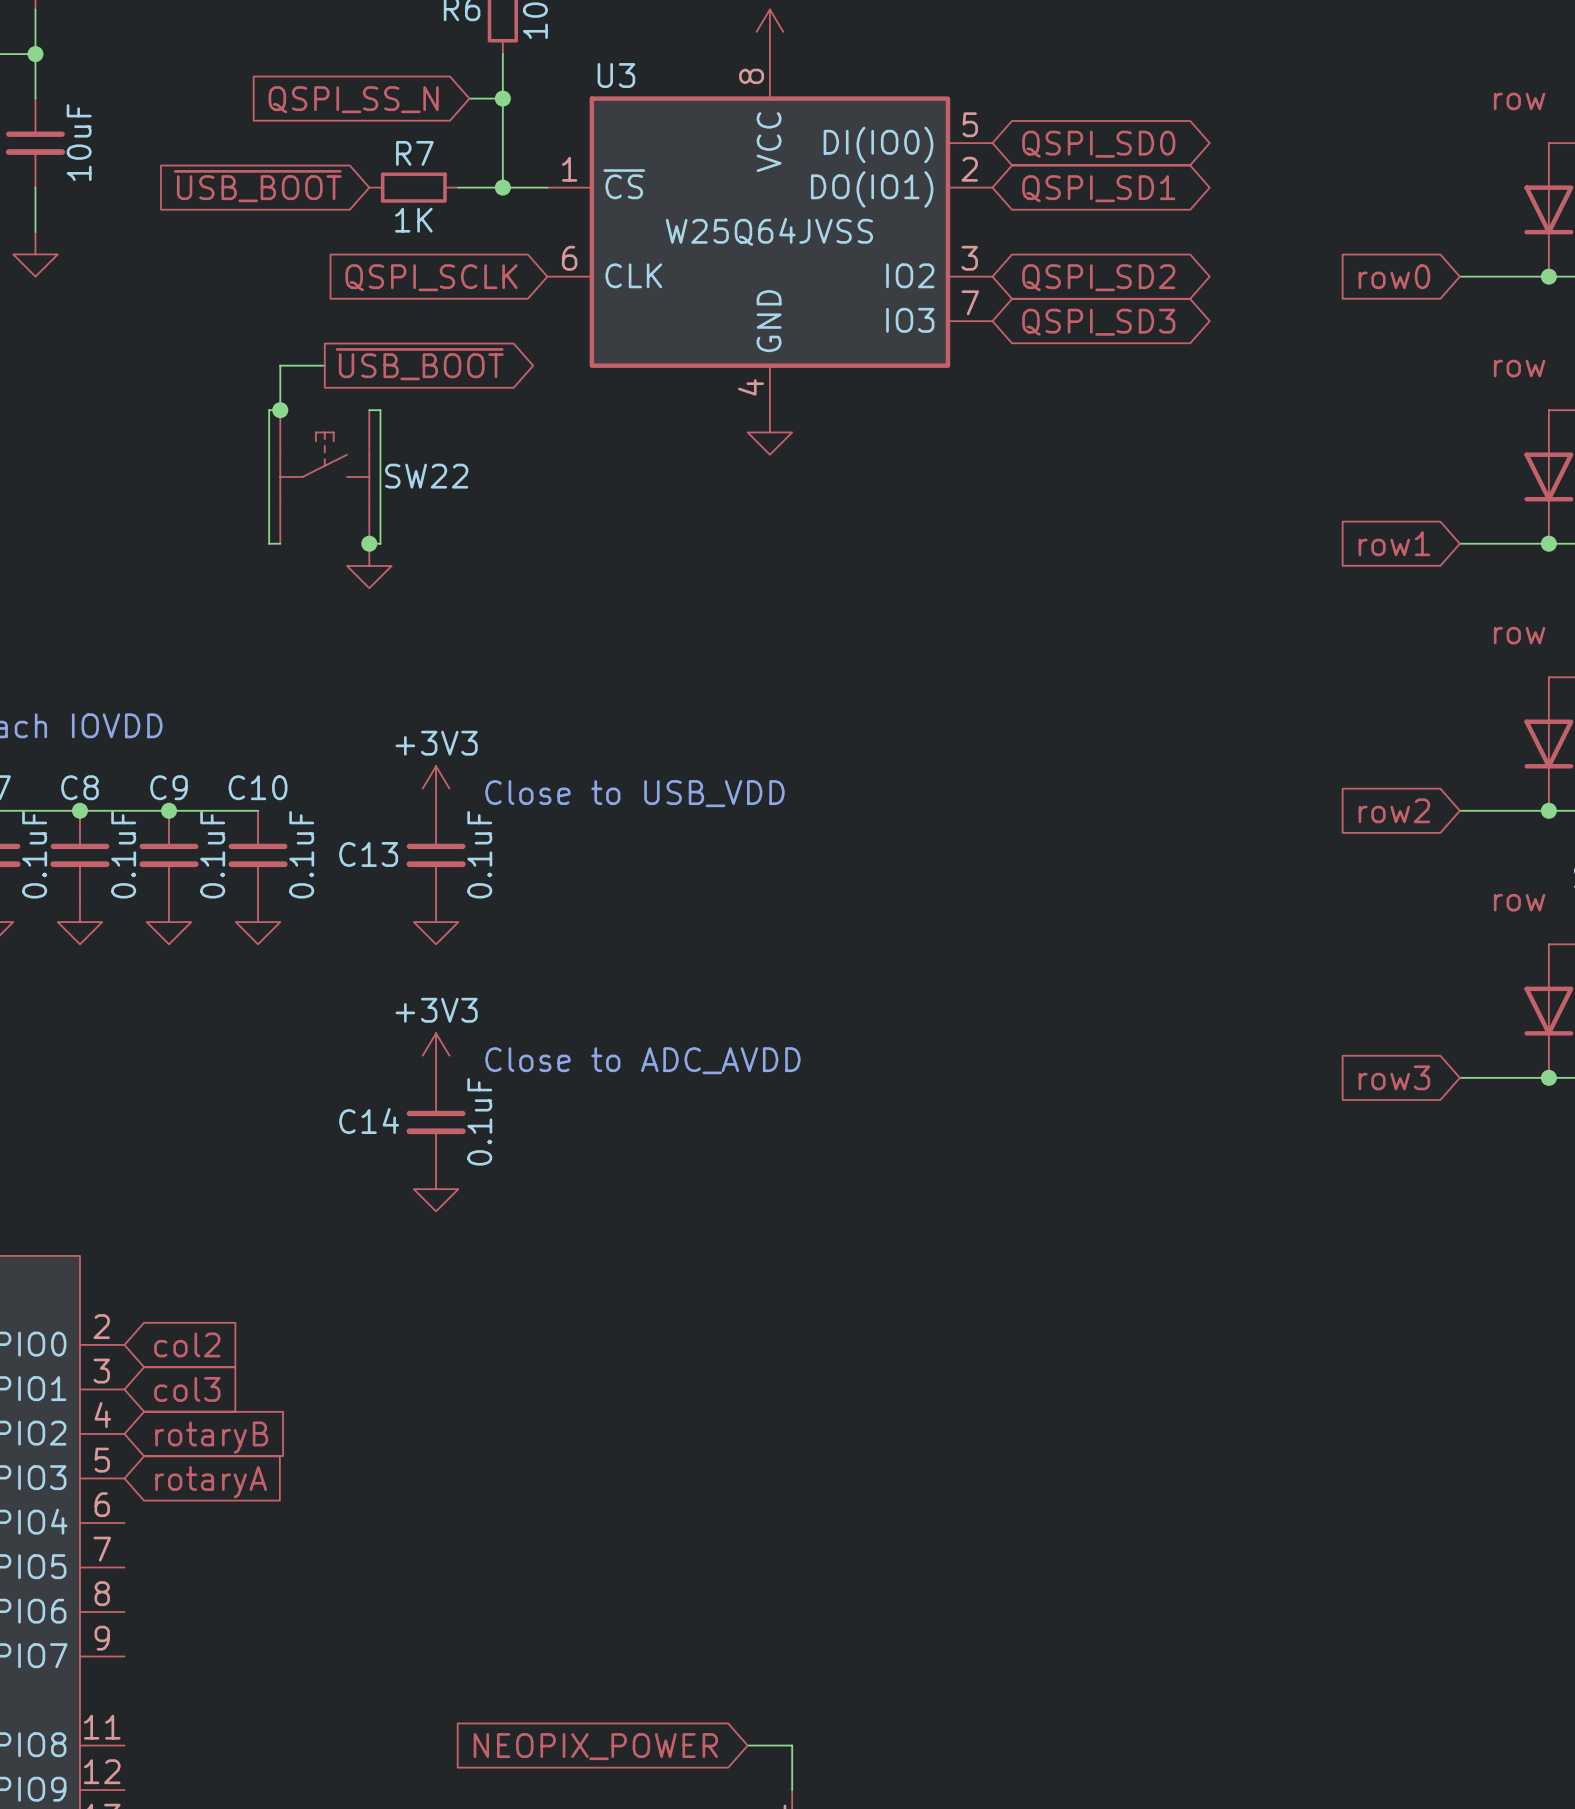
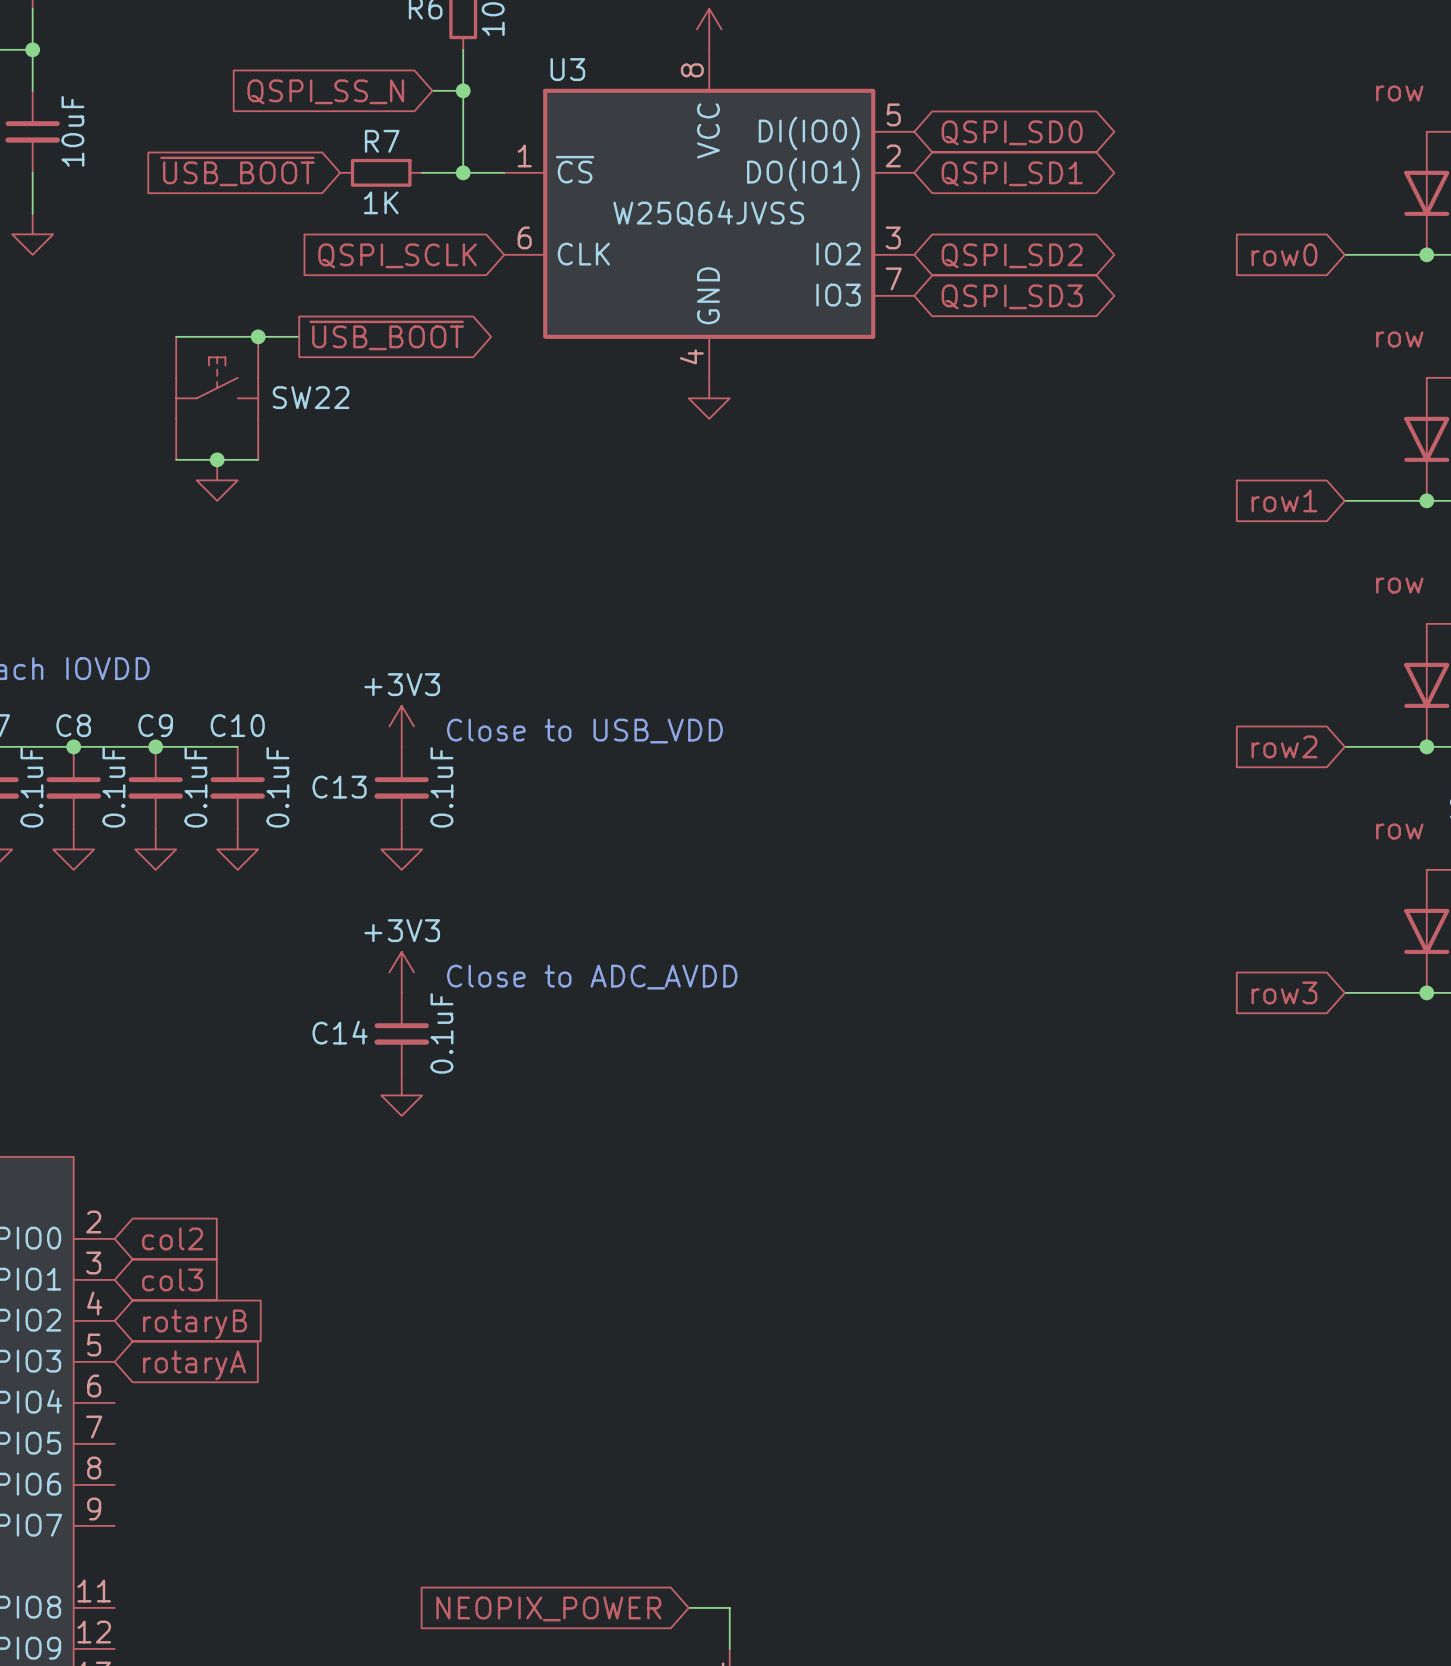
wire: (280, 365) (280, 410) (269, 410) (269, 543) (280, 543) -> (258, 336) (176, 336)
junction position: (280, 410) -> (258, 336)
wire: (369, 410) (380, 410) (380, 543) (369, 543) -> none
SW22 position: (324, 476) -> (217, 398)
wire: none -> (176, 459) (258, 459)
junction: none -> (217, 459)
junction: (369, 543) -> none
power symbol position: (369, 565) -> (217, 480)

